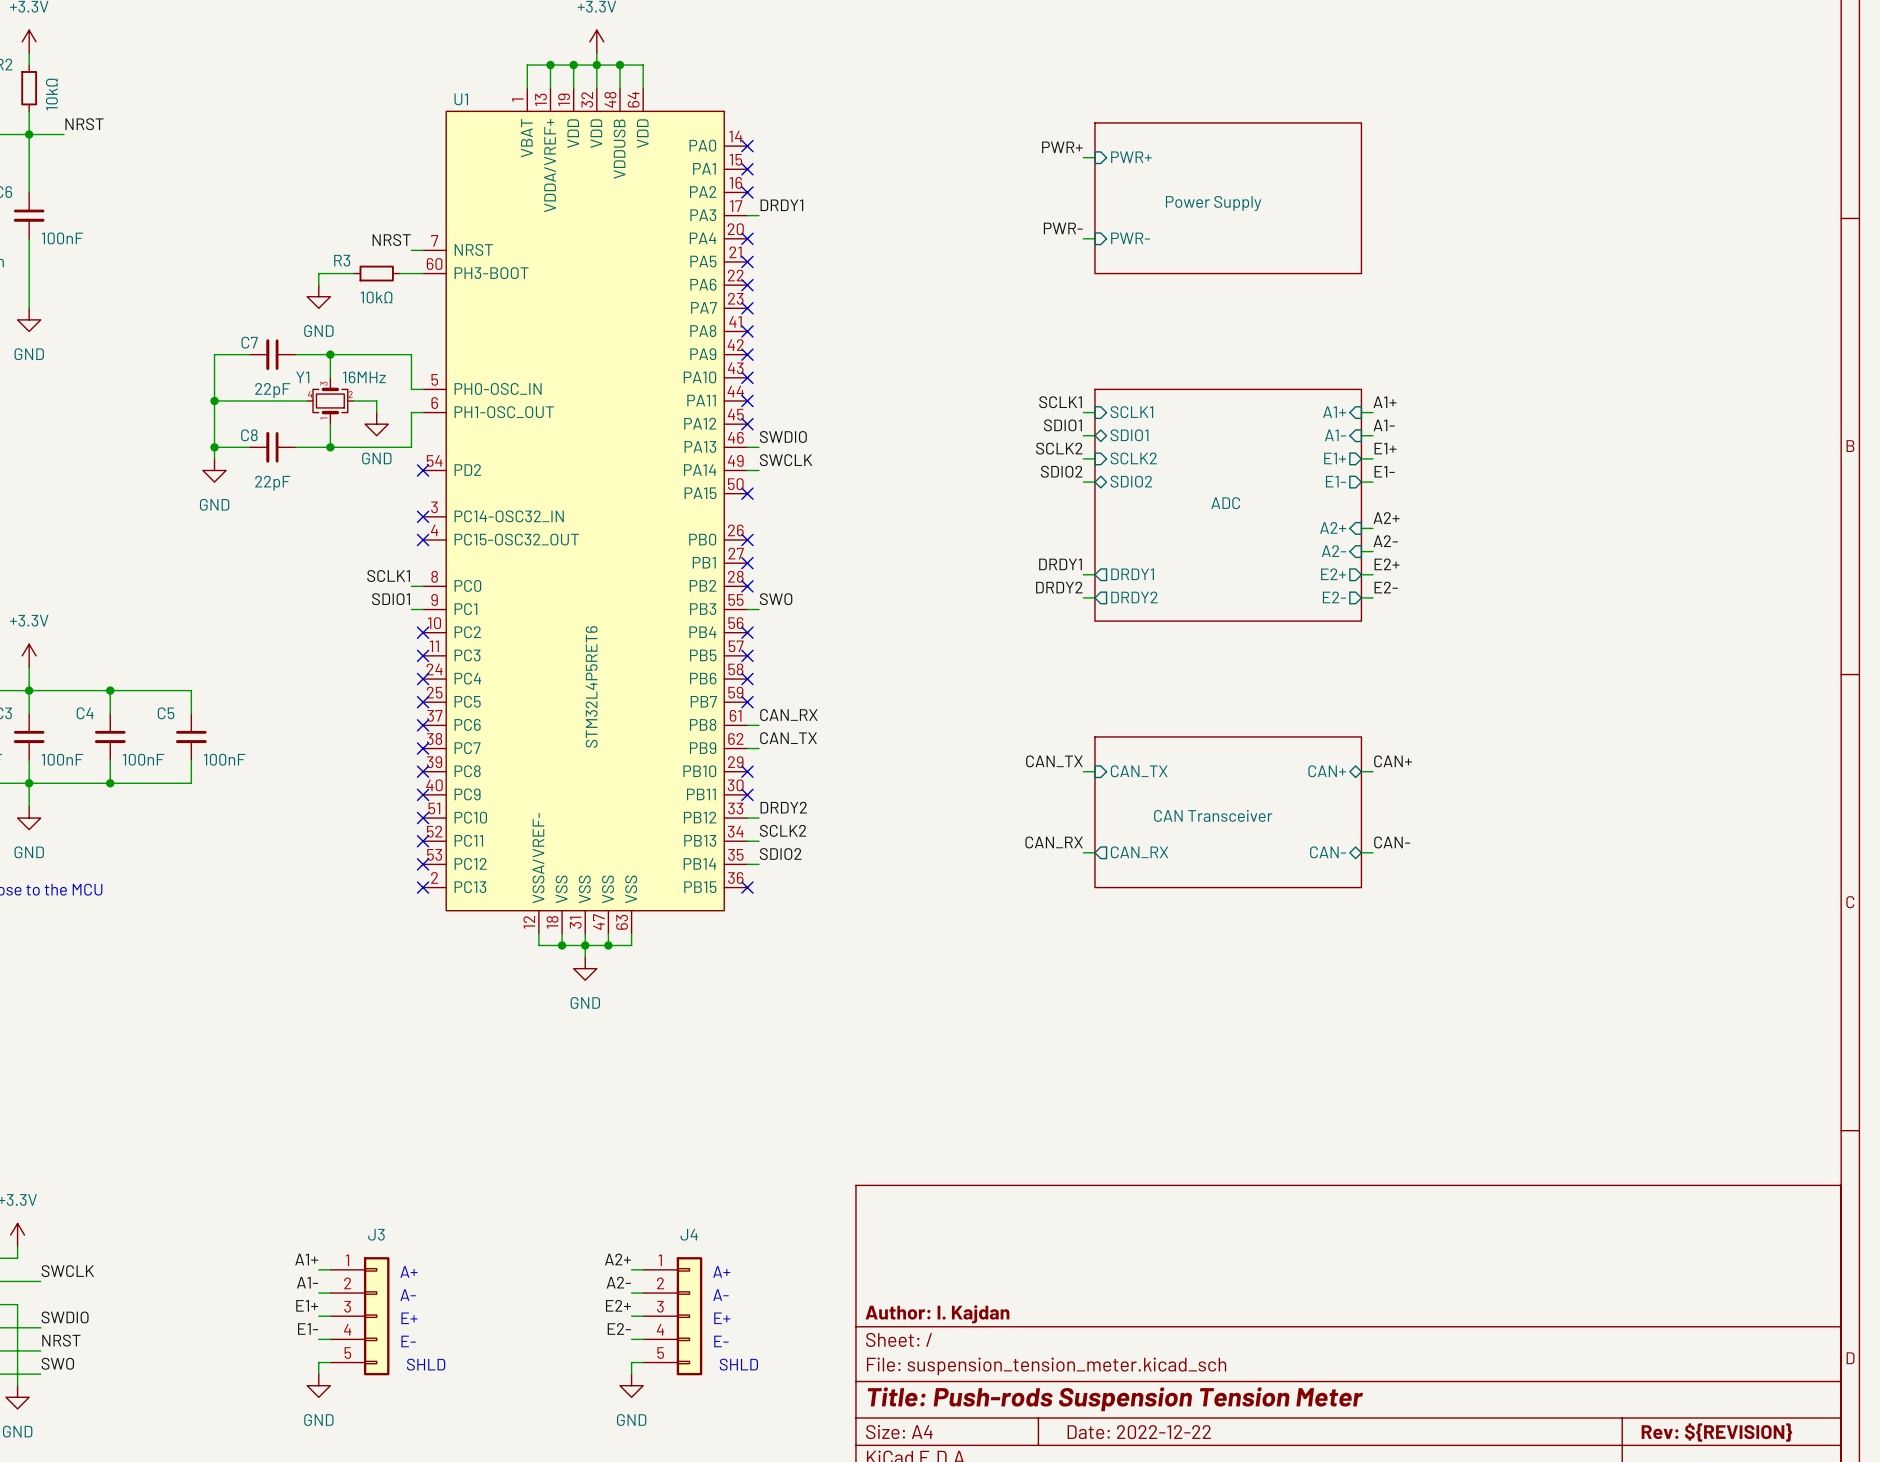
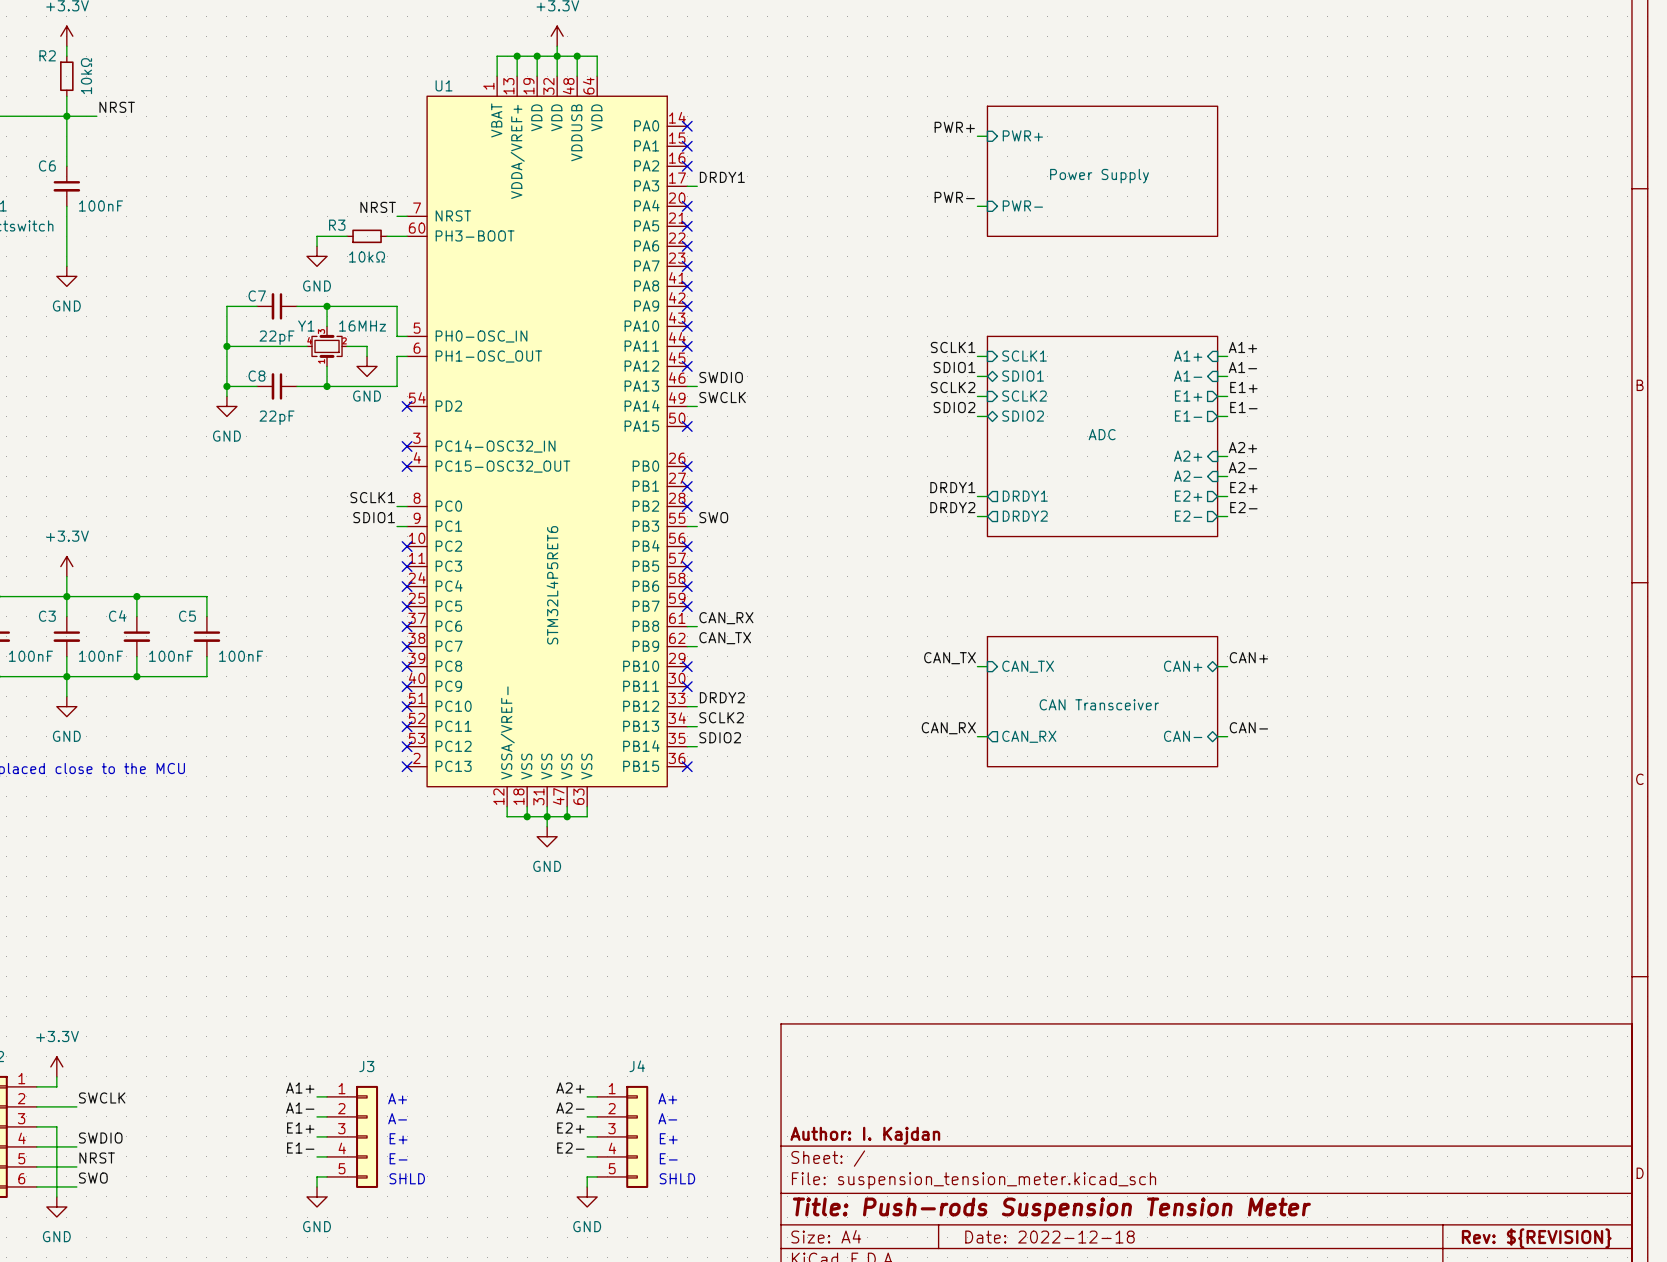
title block: Date: 2022-12-22 (1139, 1432) -> Date: 2022-12-18 (1049, 1237)

